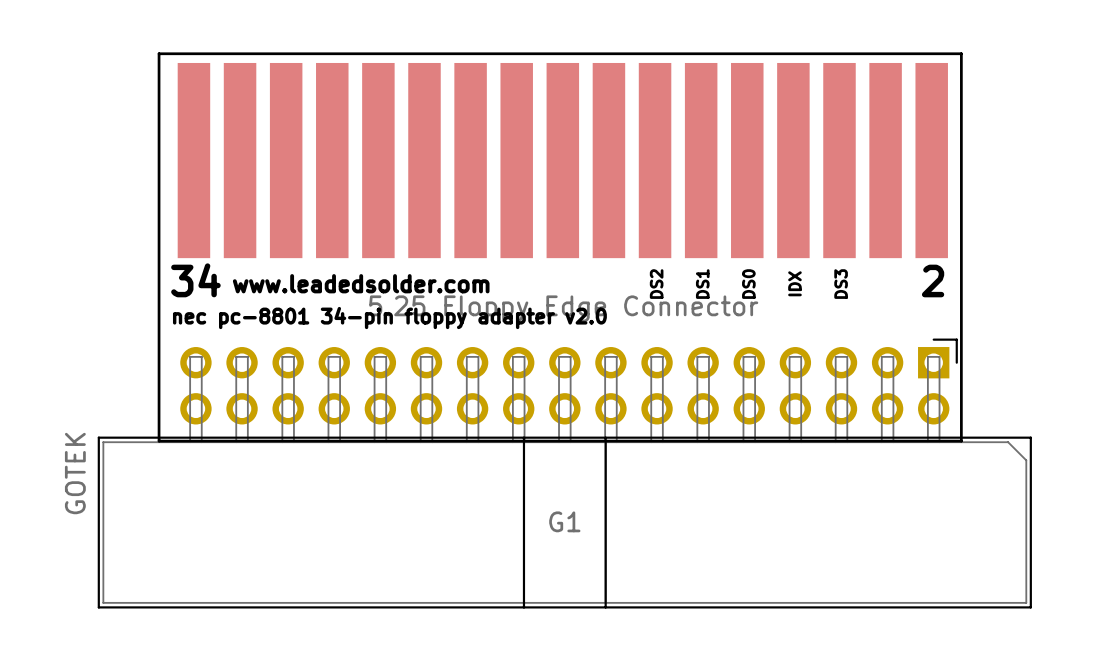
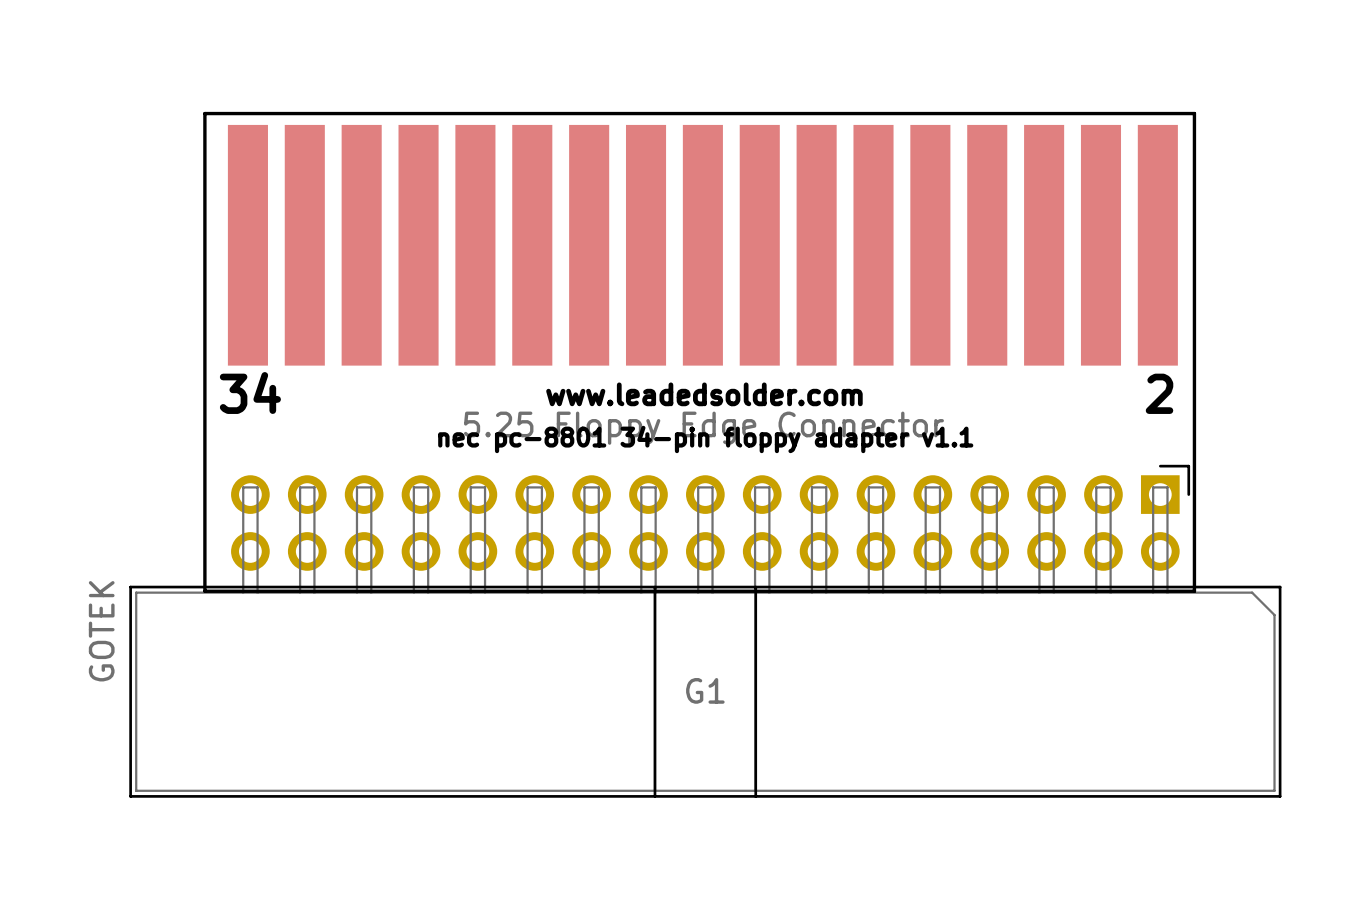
text position: www.leadedsolder.com (361, 283) -> www.leadedsolder.com (704, 394)
text: IDX (794, 283) -> none
text: DS2 (656, 284) -> none
text: DS1 (702, 284) -> none
text: DS0 (748, 284) -> none
text: DS3 (841, 284) -> none
text: nec pc-8801 34-pin floppy adapter v2.0 (389, 318) -> nec pc-8801 34-pin floppy adapter v1.1 (705, 439)

